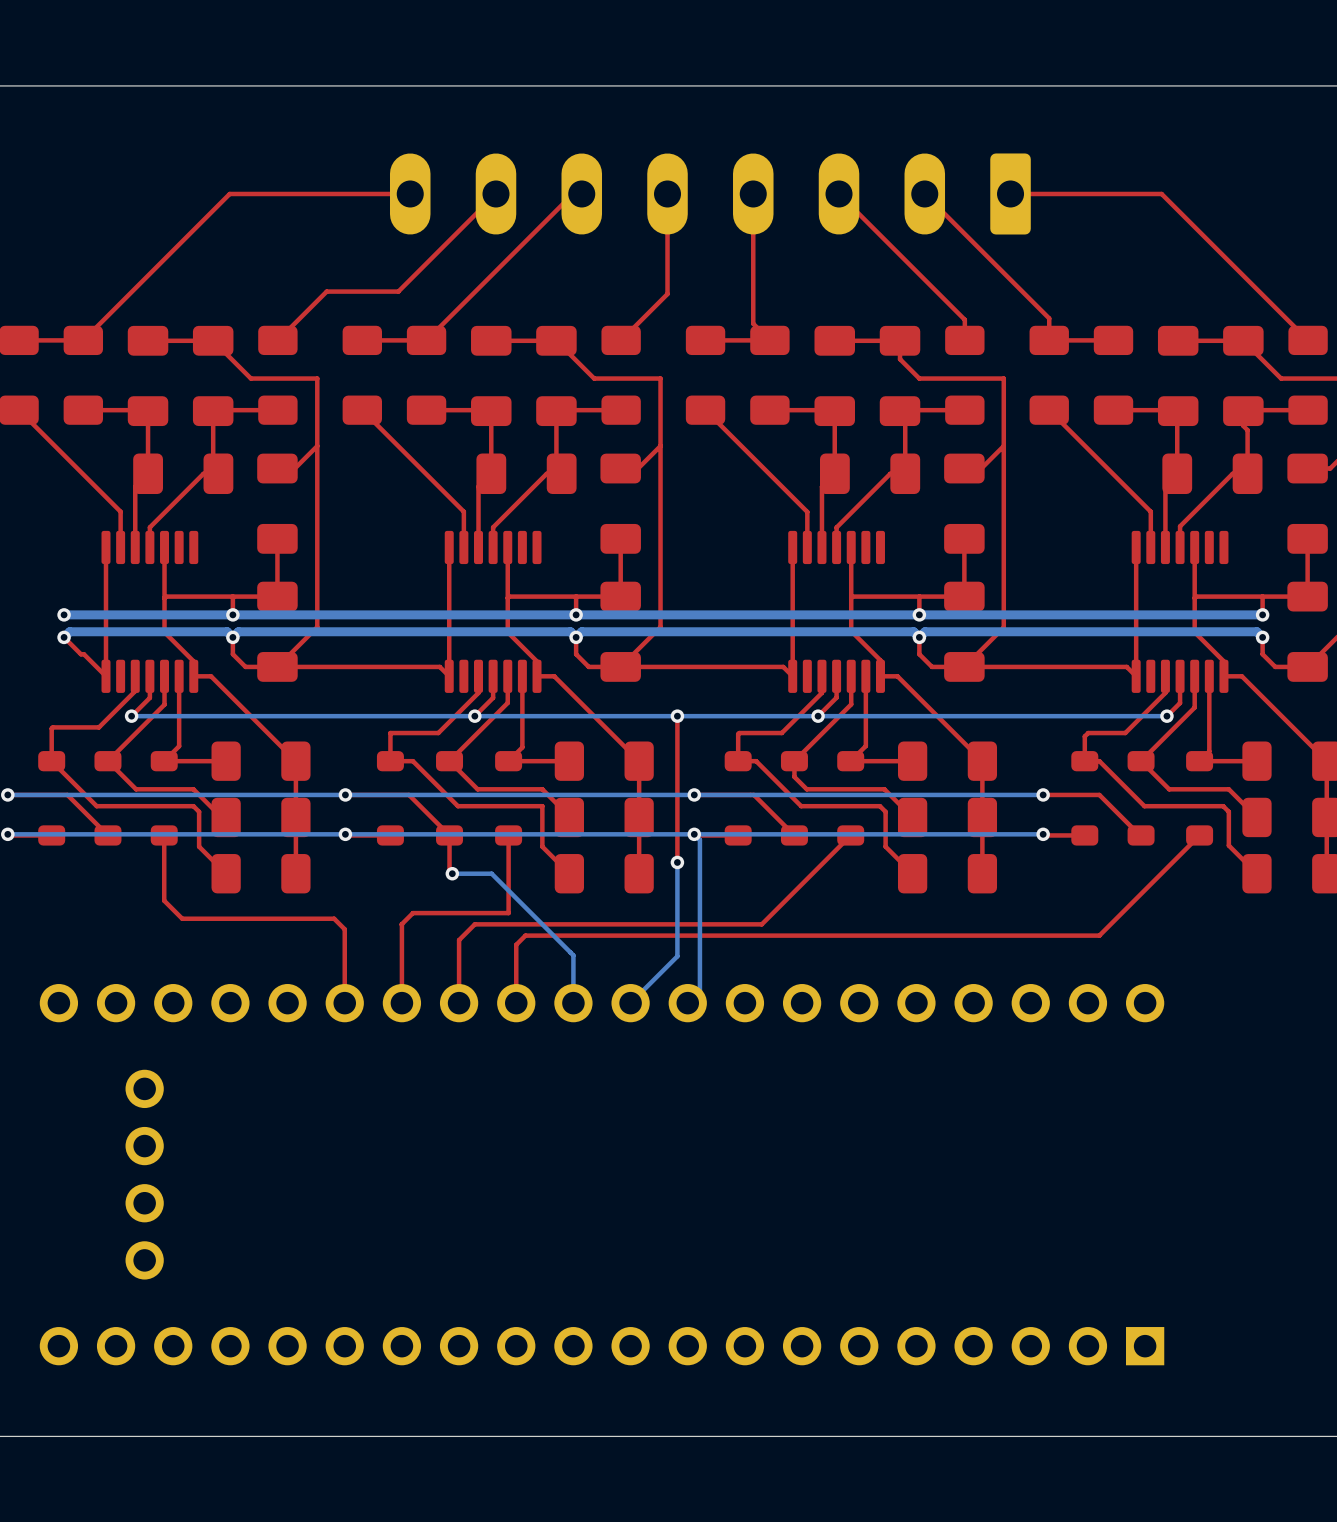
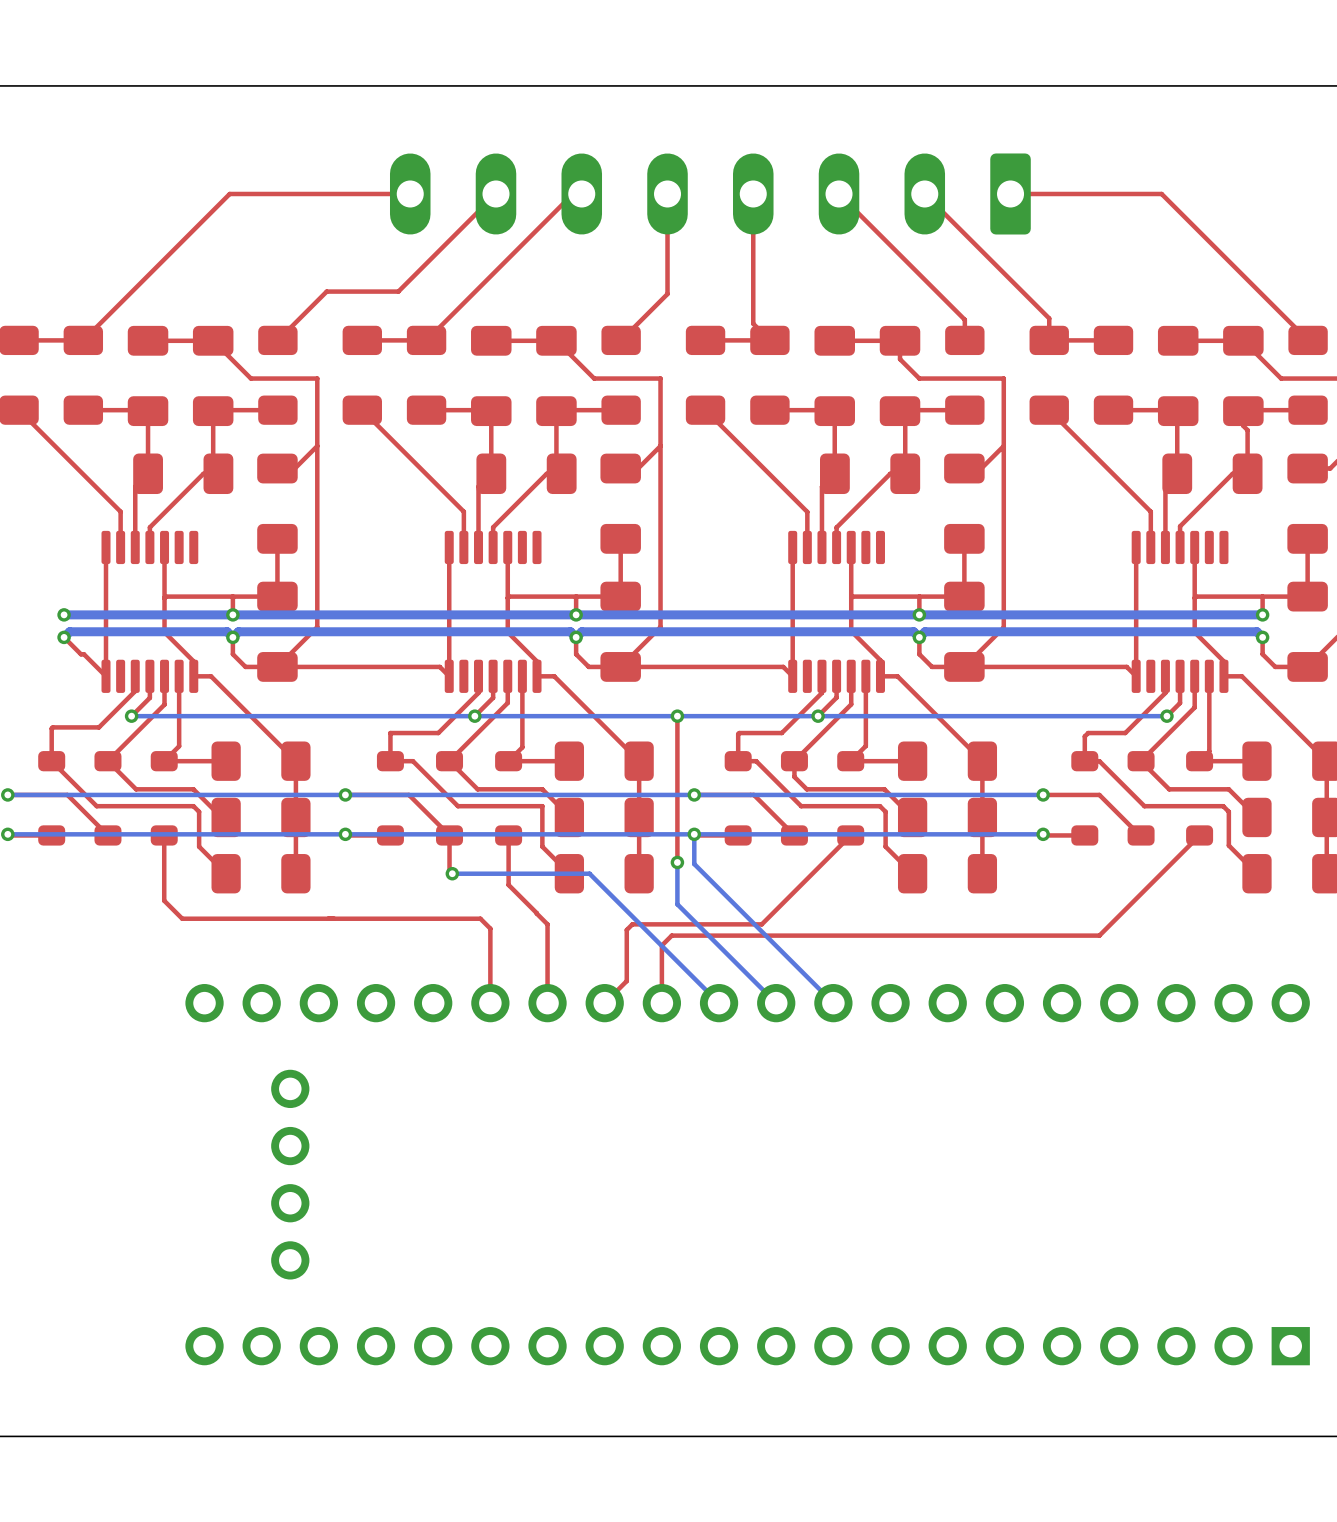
bottom track: (694, 834) (699, 839) (699, 990) (687, 1003) -> (694, 834) (694, 864) (833, 1003)
bottom track: (491, 873) (573, 955) (573, 1003) -> (491, 873) (589, 873) (719, 1003)
top track: (508, 884) (508, 913) (412, 913) (401, 924) -> (508, 884) (536, 913)
bottom track: (677, 904) (677, 956) (630, 1003) -> (677, 904) (776, 1003)
top track: none -> (536, 913) (547, 924) (547, 1003)
top track: (334, 918) (344, 929) (344, 1003) -> (334, 918) (480, 918) (490, 928) (490, 1003)
top track: (401, 924) (401, 1003) -> none
top track: (632, 924) (474, 924) (459, 940) (459, 1003) -> (632, 924) (626, 929) (626, 981) (604, 1003)
top track: (671, 935) (525, 935) (516, 944) (516, 1003) -> (671, 935) (661, 945) (661, 1003)
part position: (602, 1174) -> (747, 1174)

